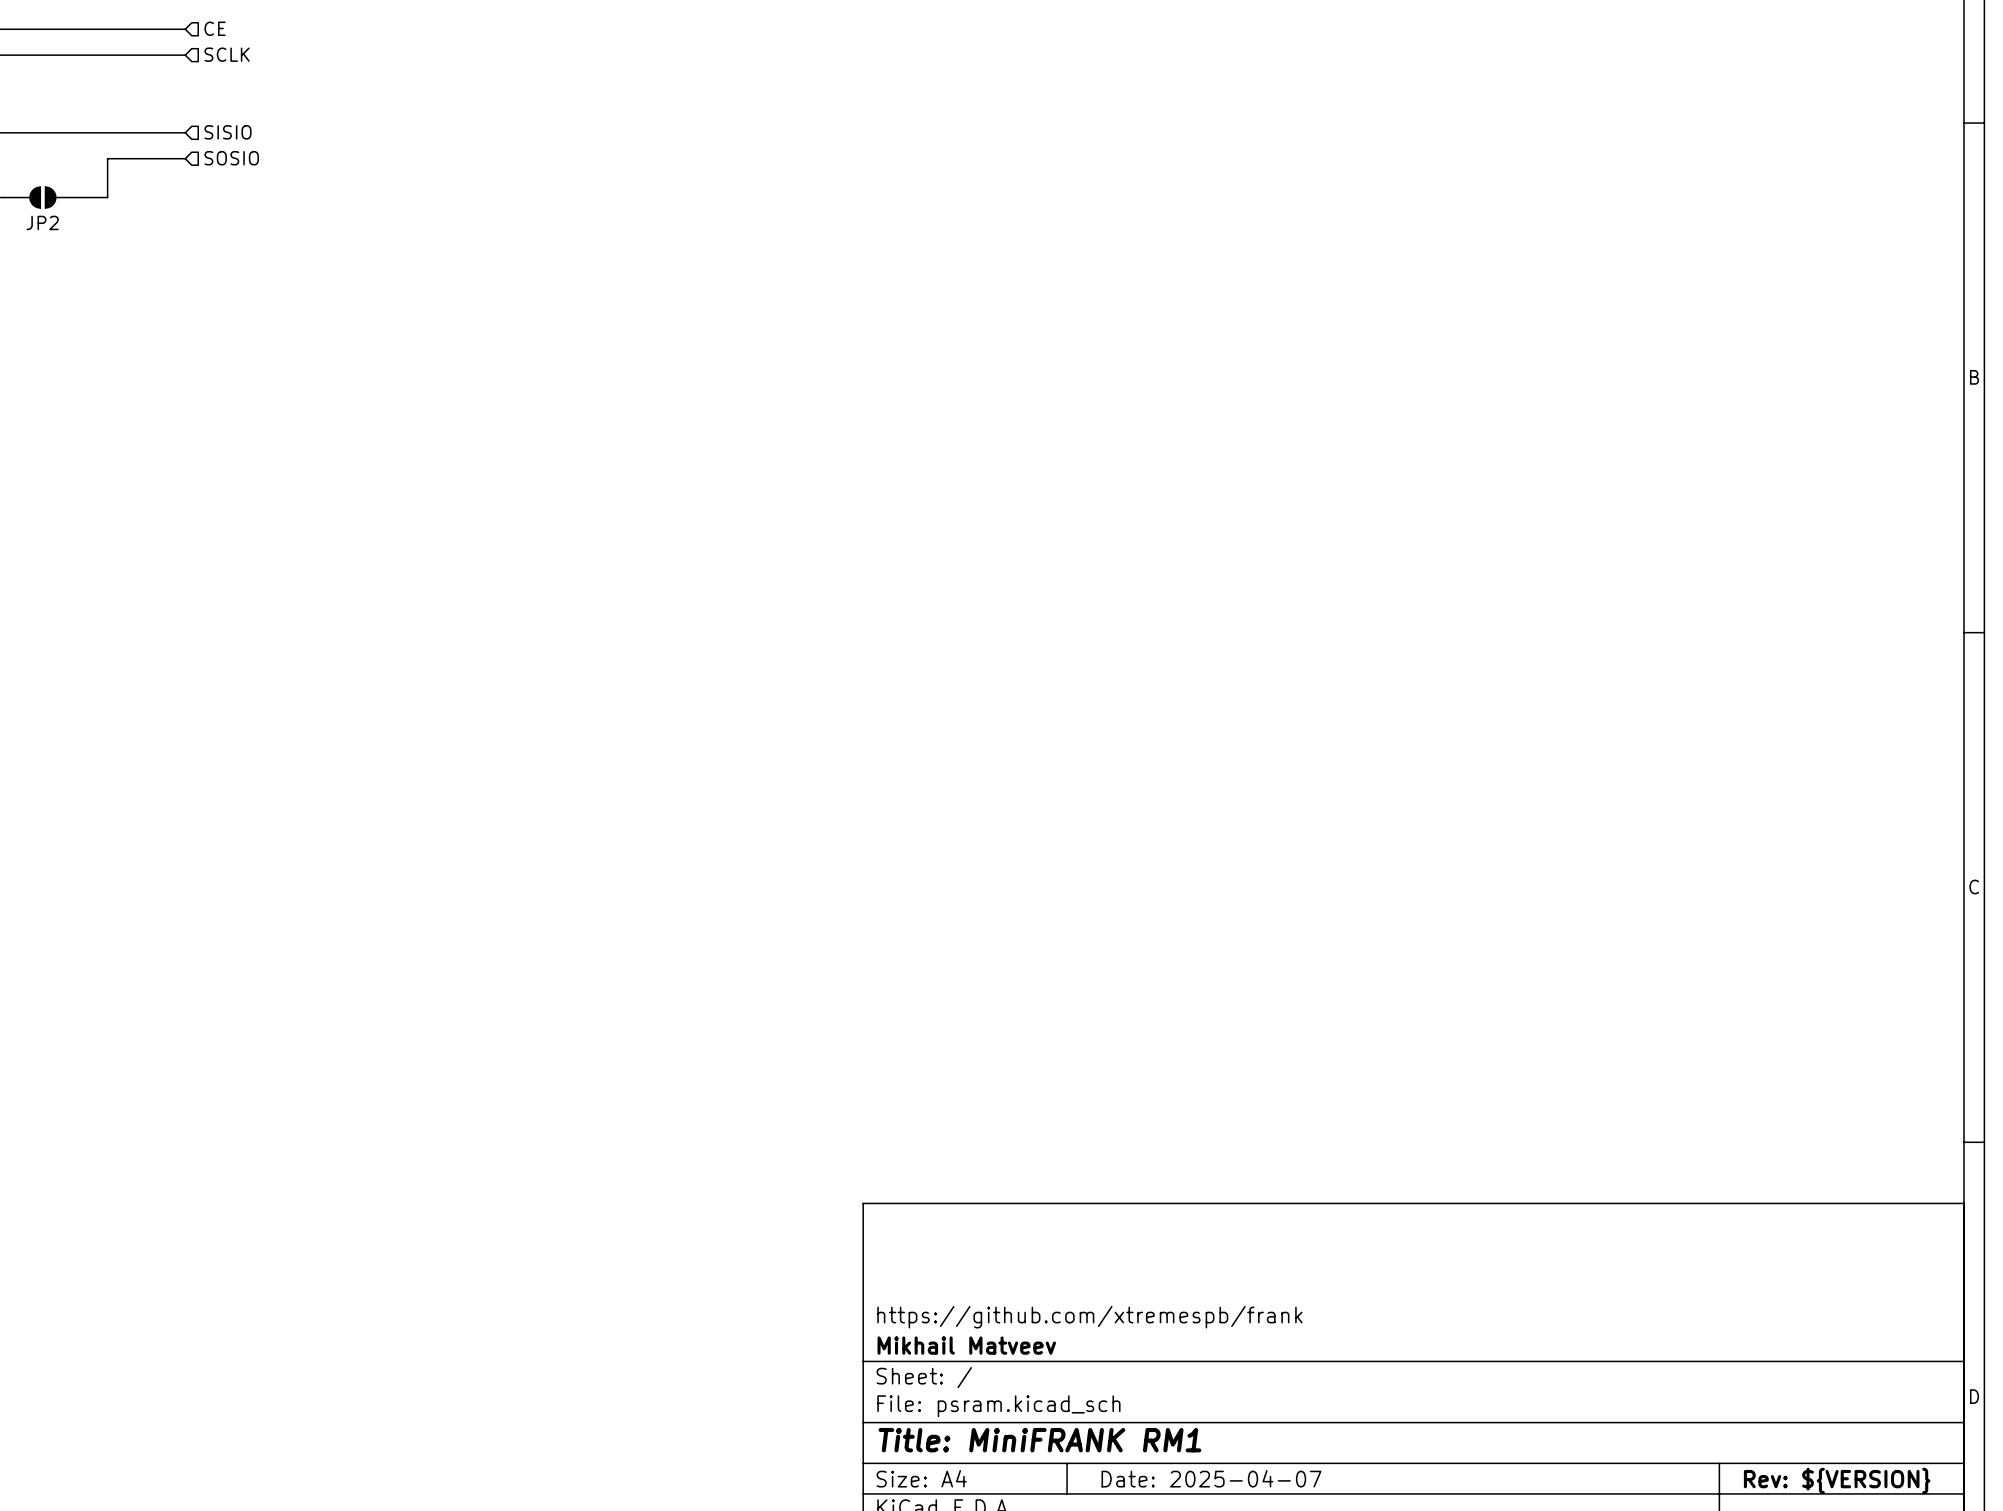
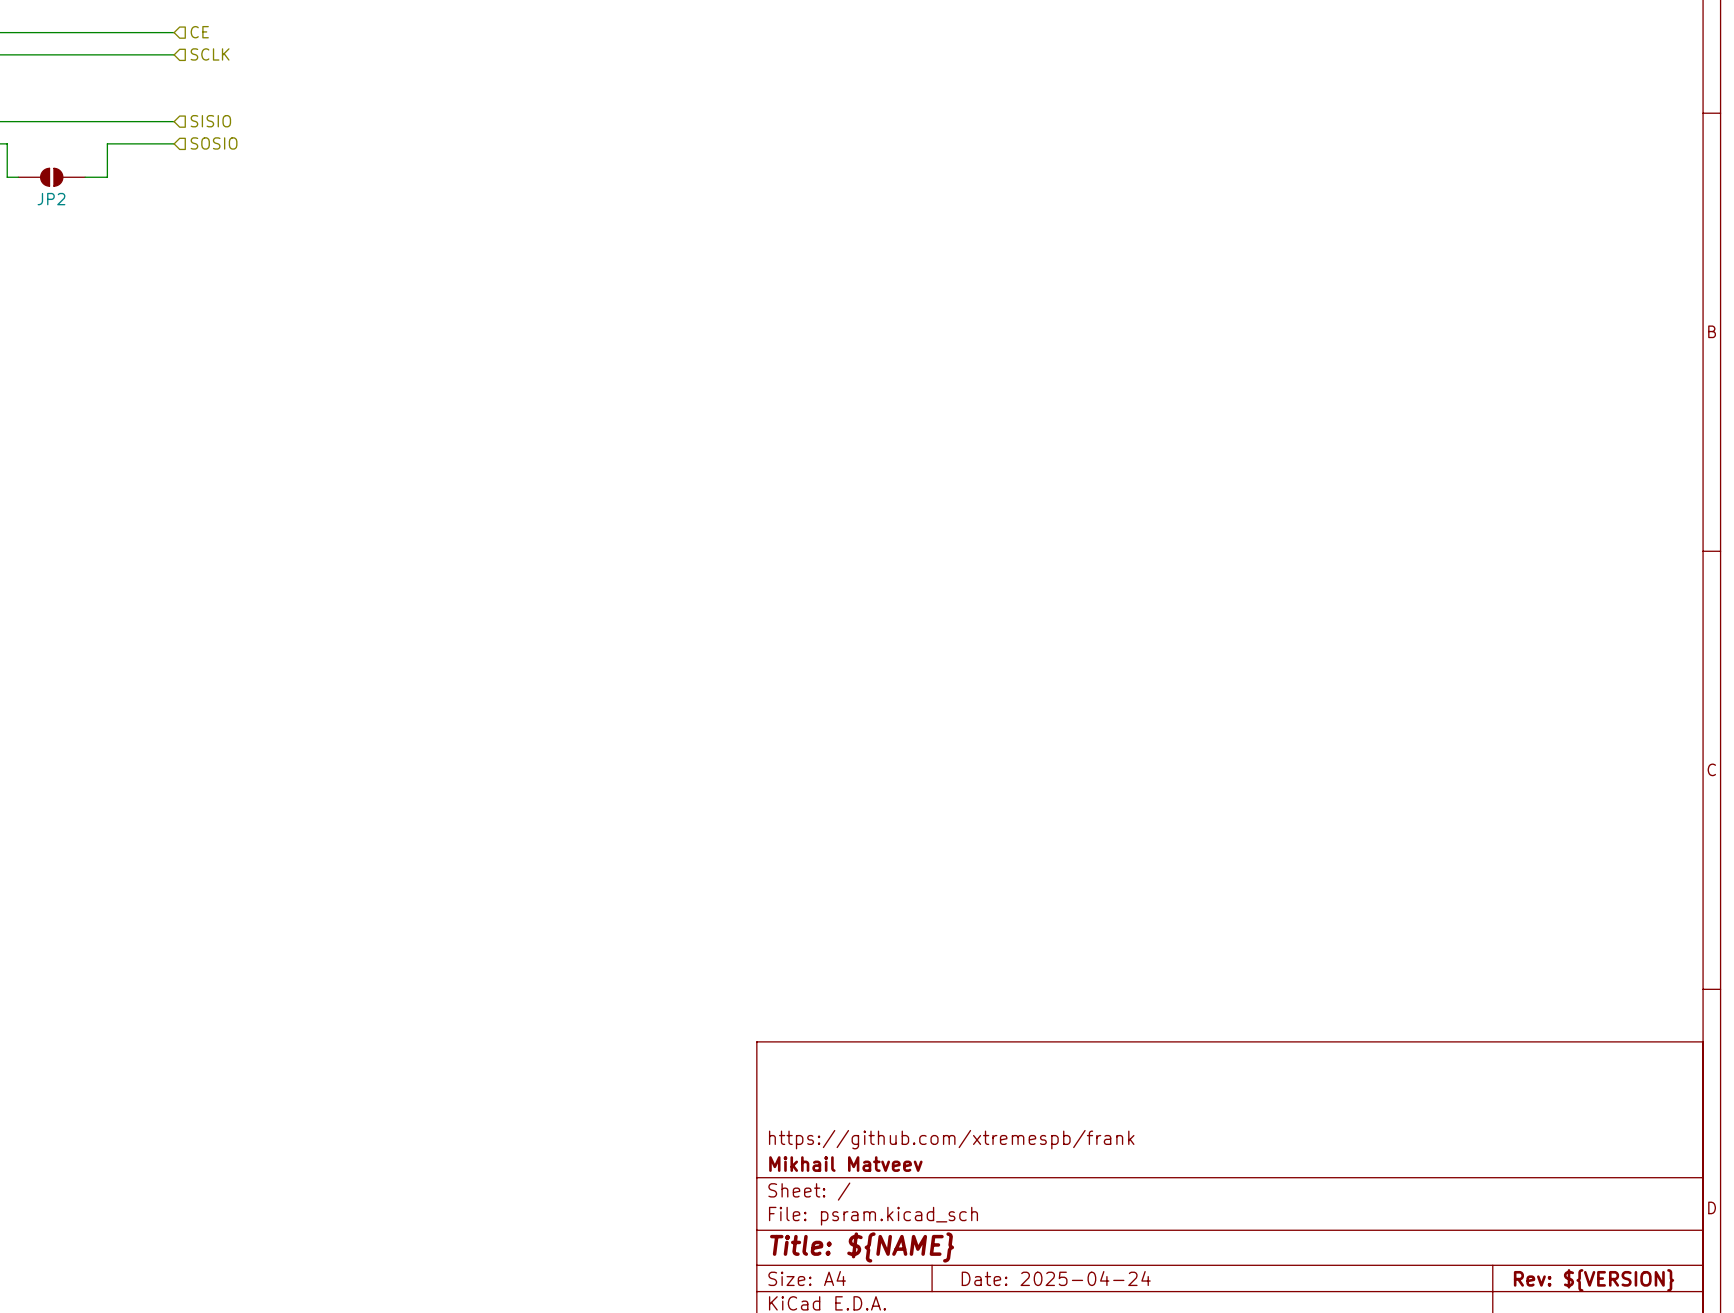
title block: Title: MiniFRANK RM1 (1039, 1440) -> Title: ${NAME} (862, 1247)
title block: Date: 2025-04-07 (1211, 1478) -> Date: 2025-04-24 (1056, 1278)

